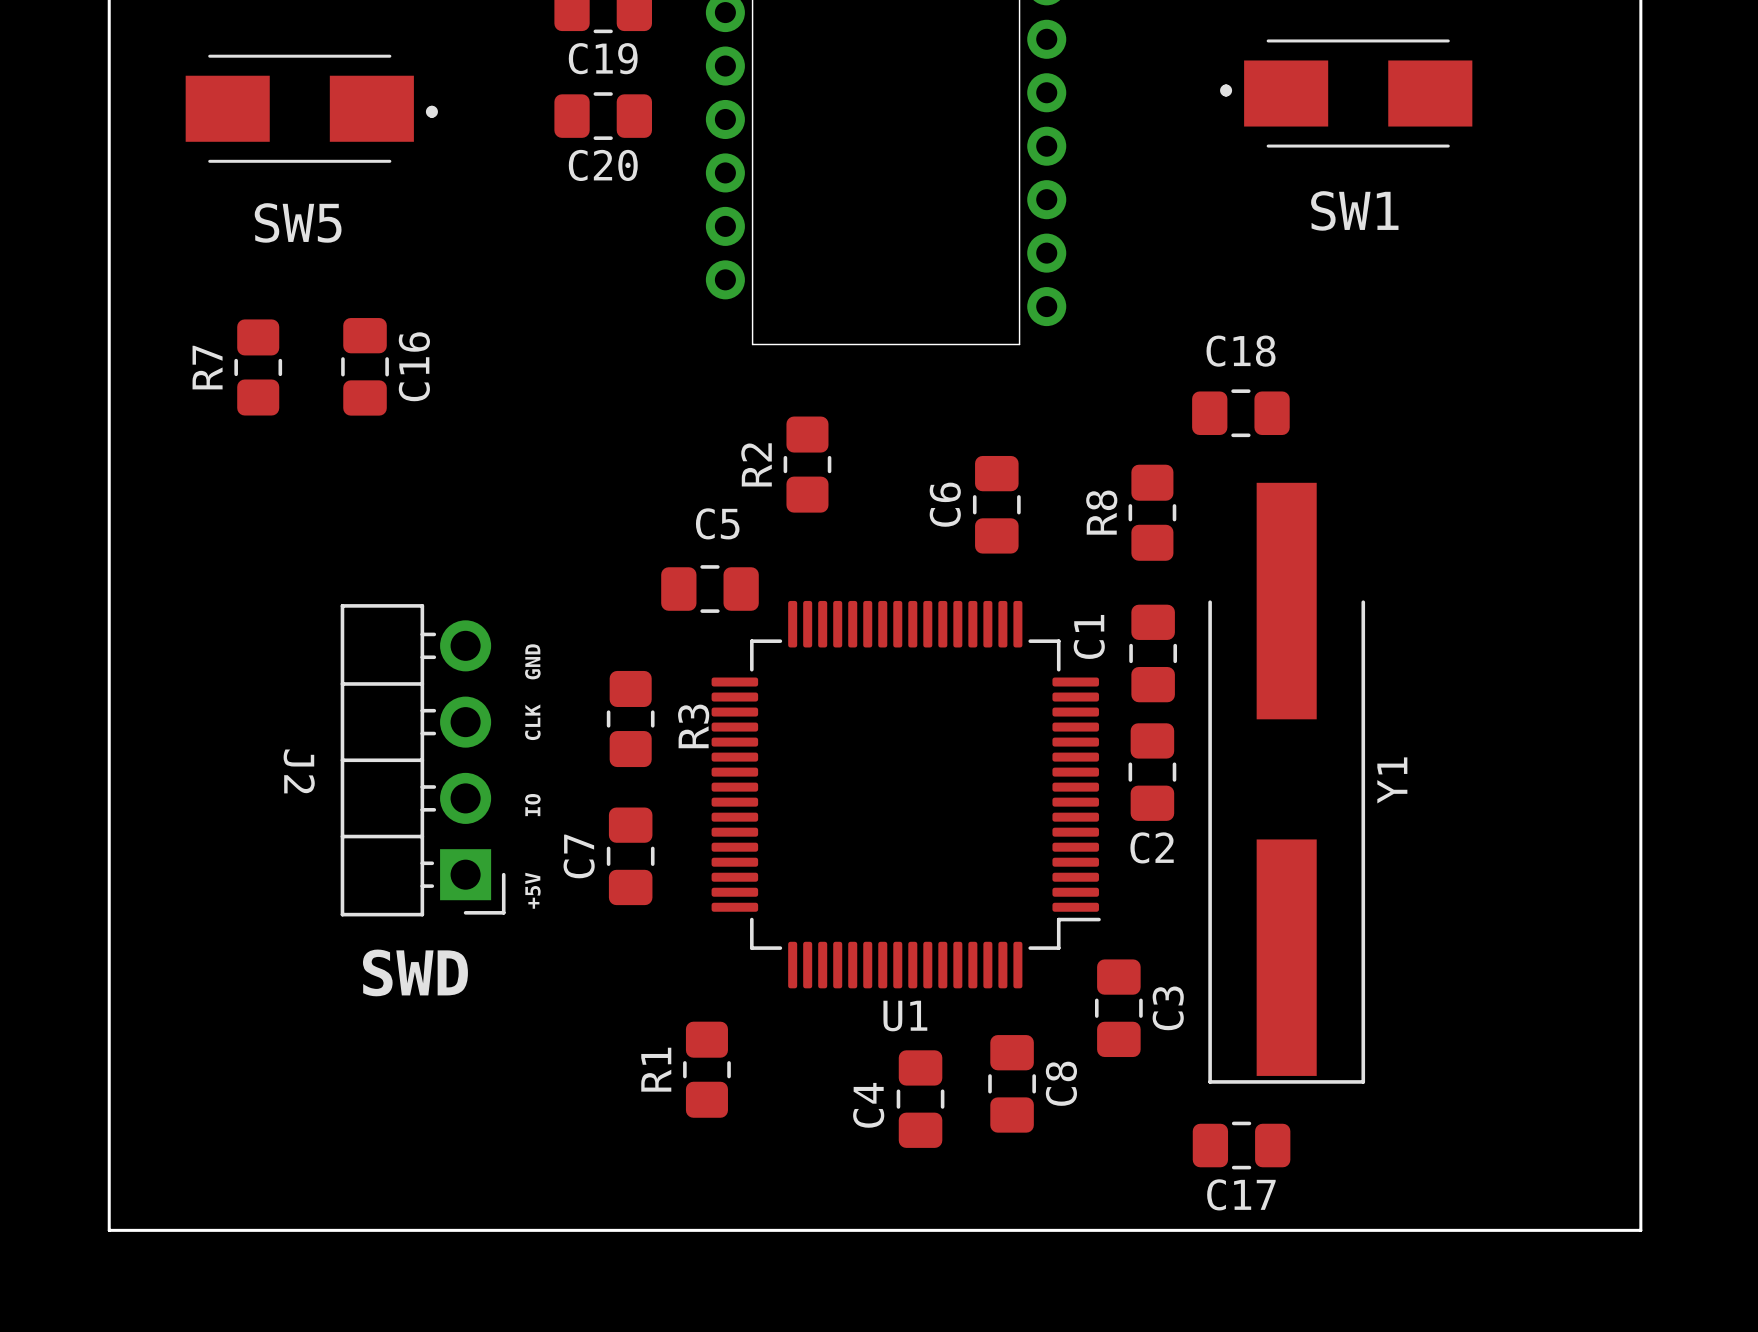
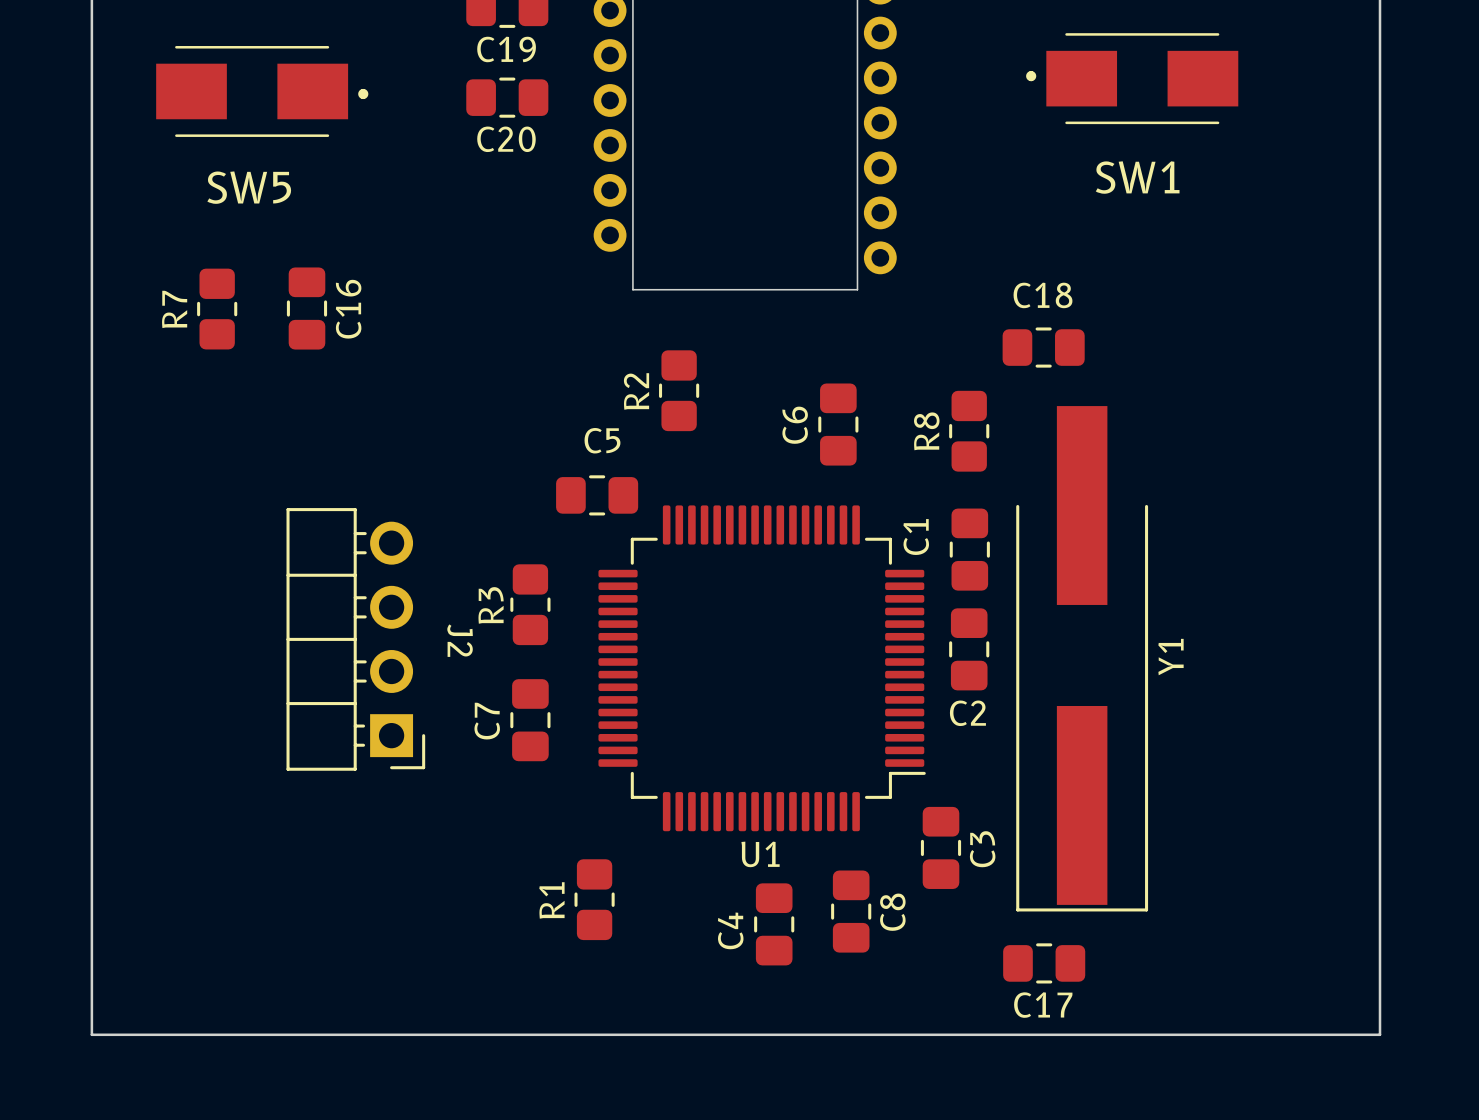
text: GND (532, 661) -> none
text: CLK (532, 722) -> none
R3 name position: R3 (693, 726) -> R3 (491, 605)
J2 name position: J2 (299, 771) -> J2 (460, 640)
text: IO (532, 805) -> none
text: +5V (532, 890) -> none
text: SWD (415, 972) -> none

